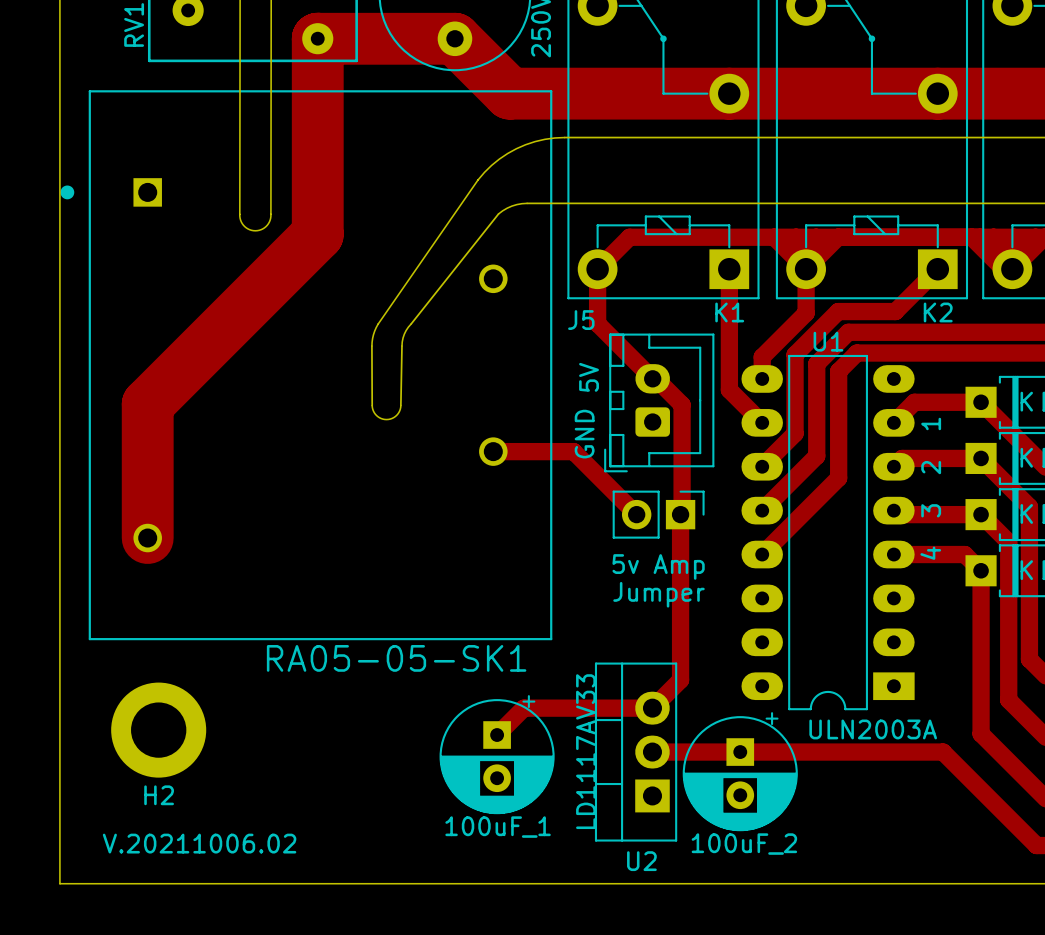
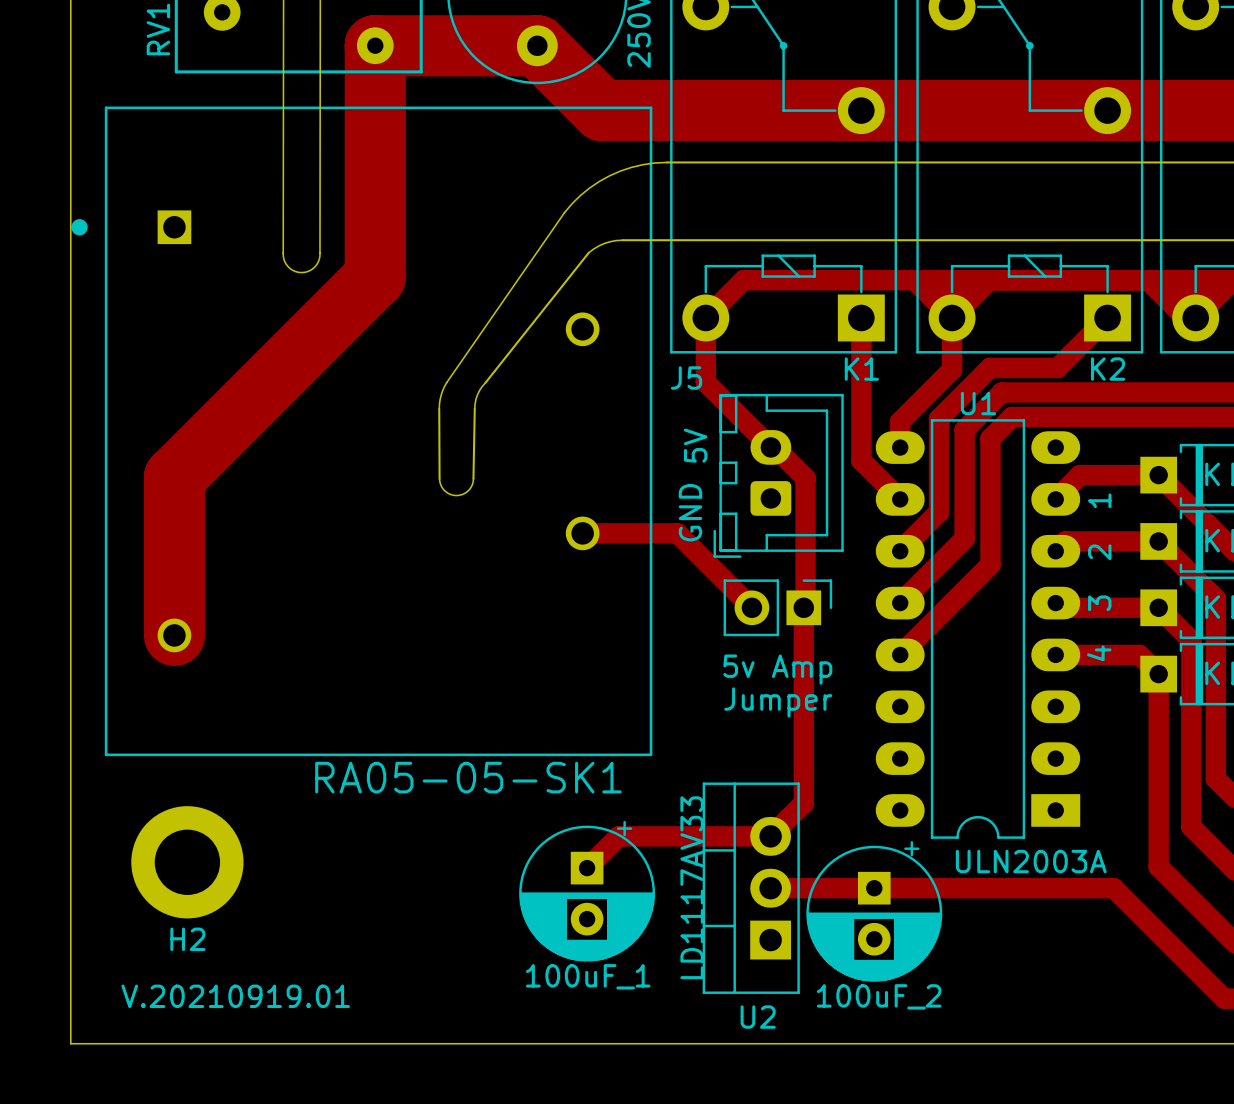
text: V.20211006.02 (199, 843) -> V.20210919.01 (235, 996)

